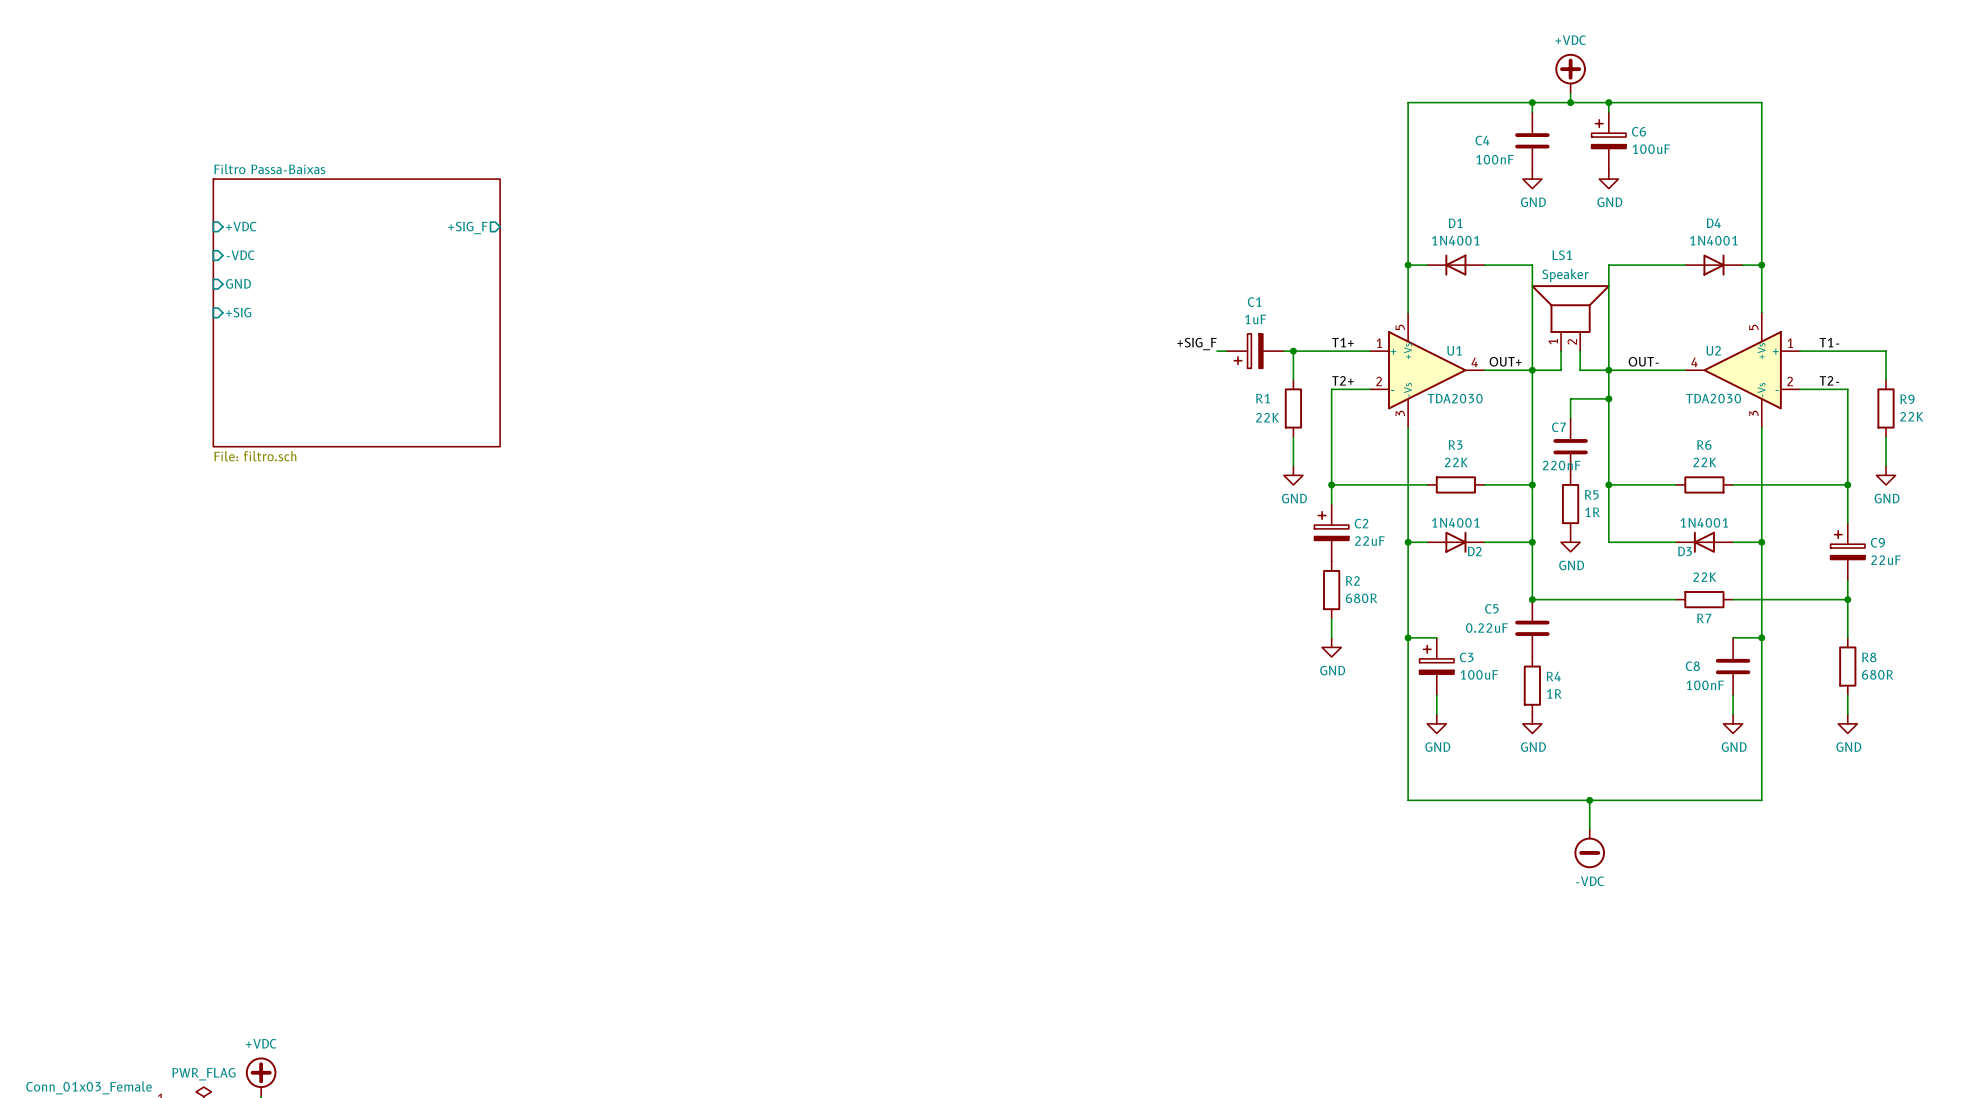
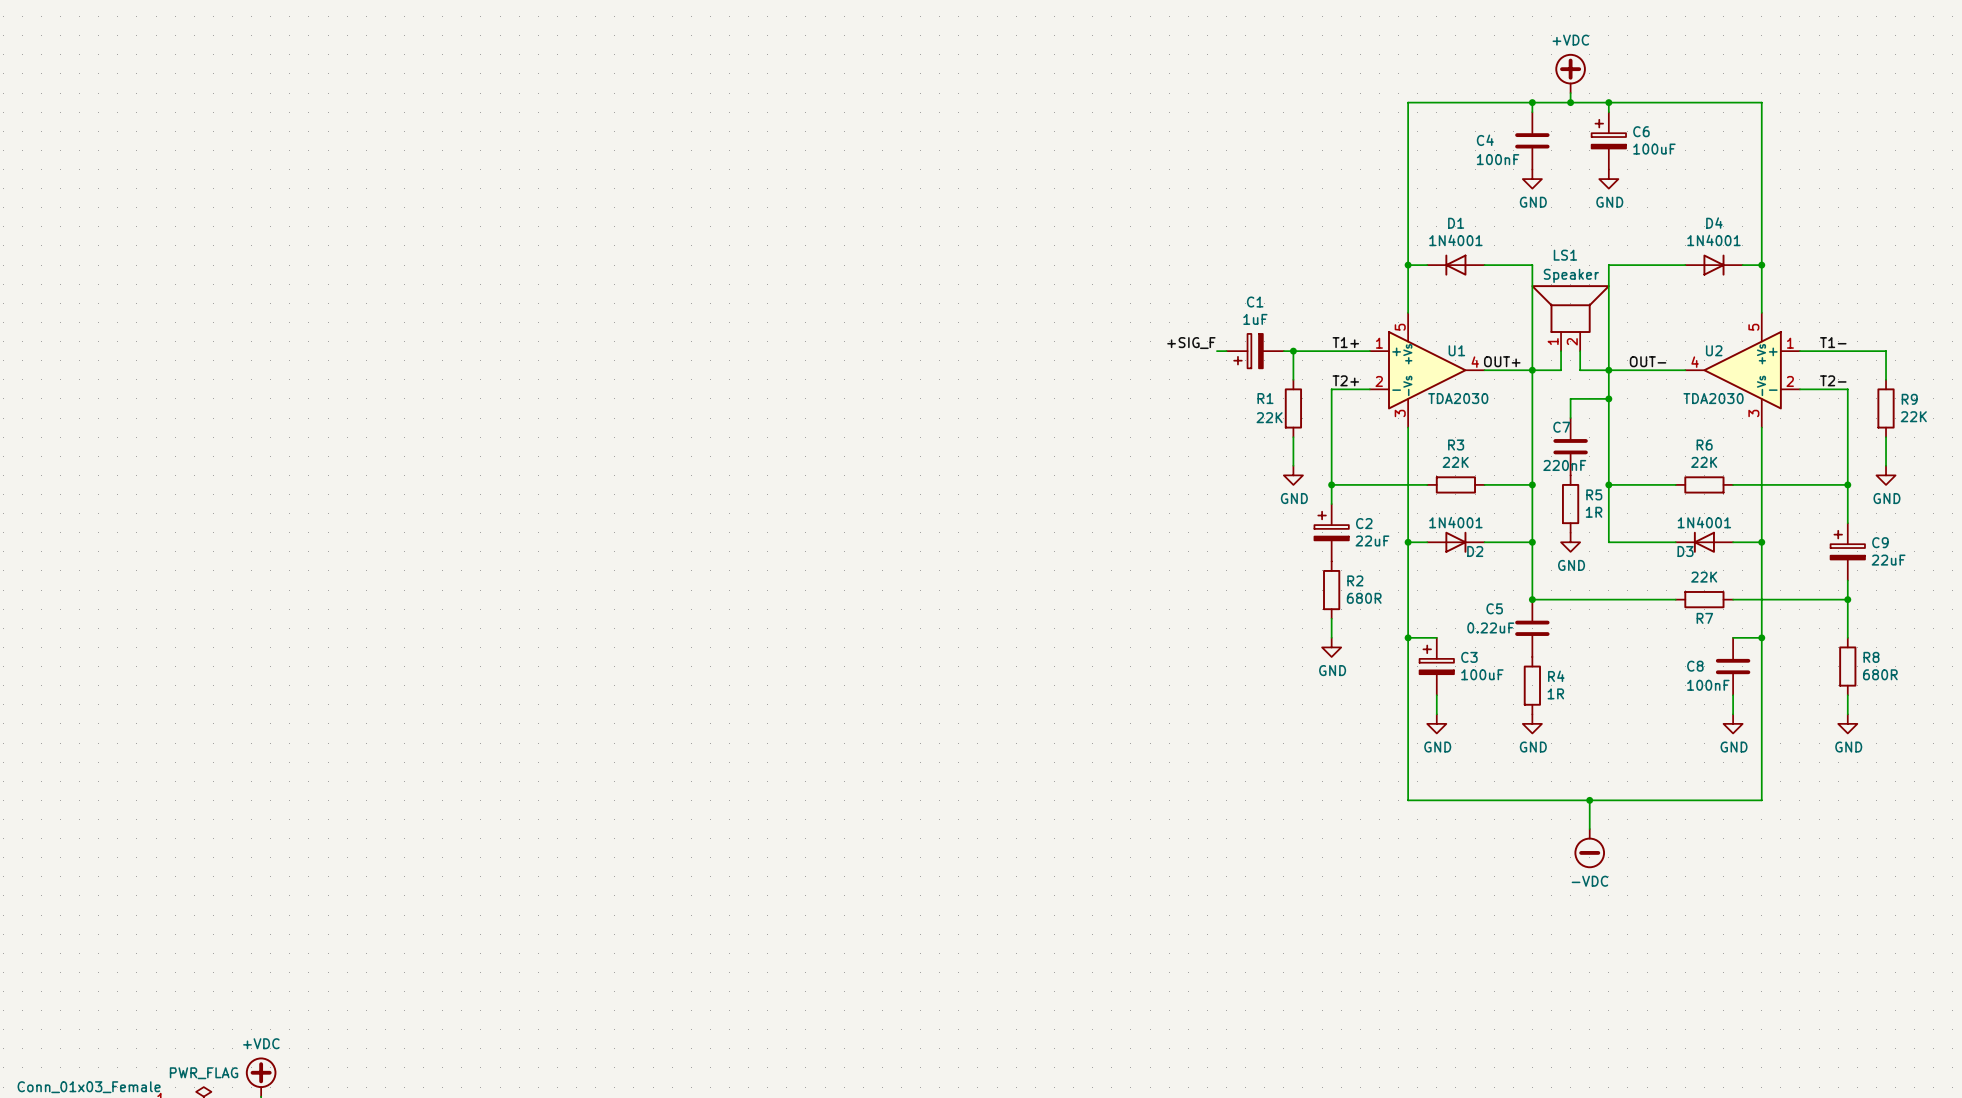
sheet pin: +VDC (241, 226) -> none
sheet pin: +SIG_F (467, 227) -> none
sheet pin: -VDC (240, 255) -> none
sheet pin: GND (238, 283) -> none
sheet pin: +SIG (238, 312) -> none
sheet Filtro Passa-Baixas: File: filtro.sch (356, 312) -> none

